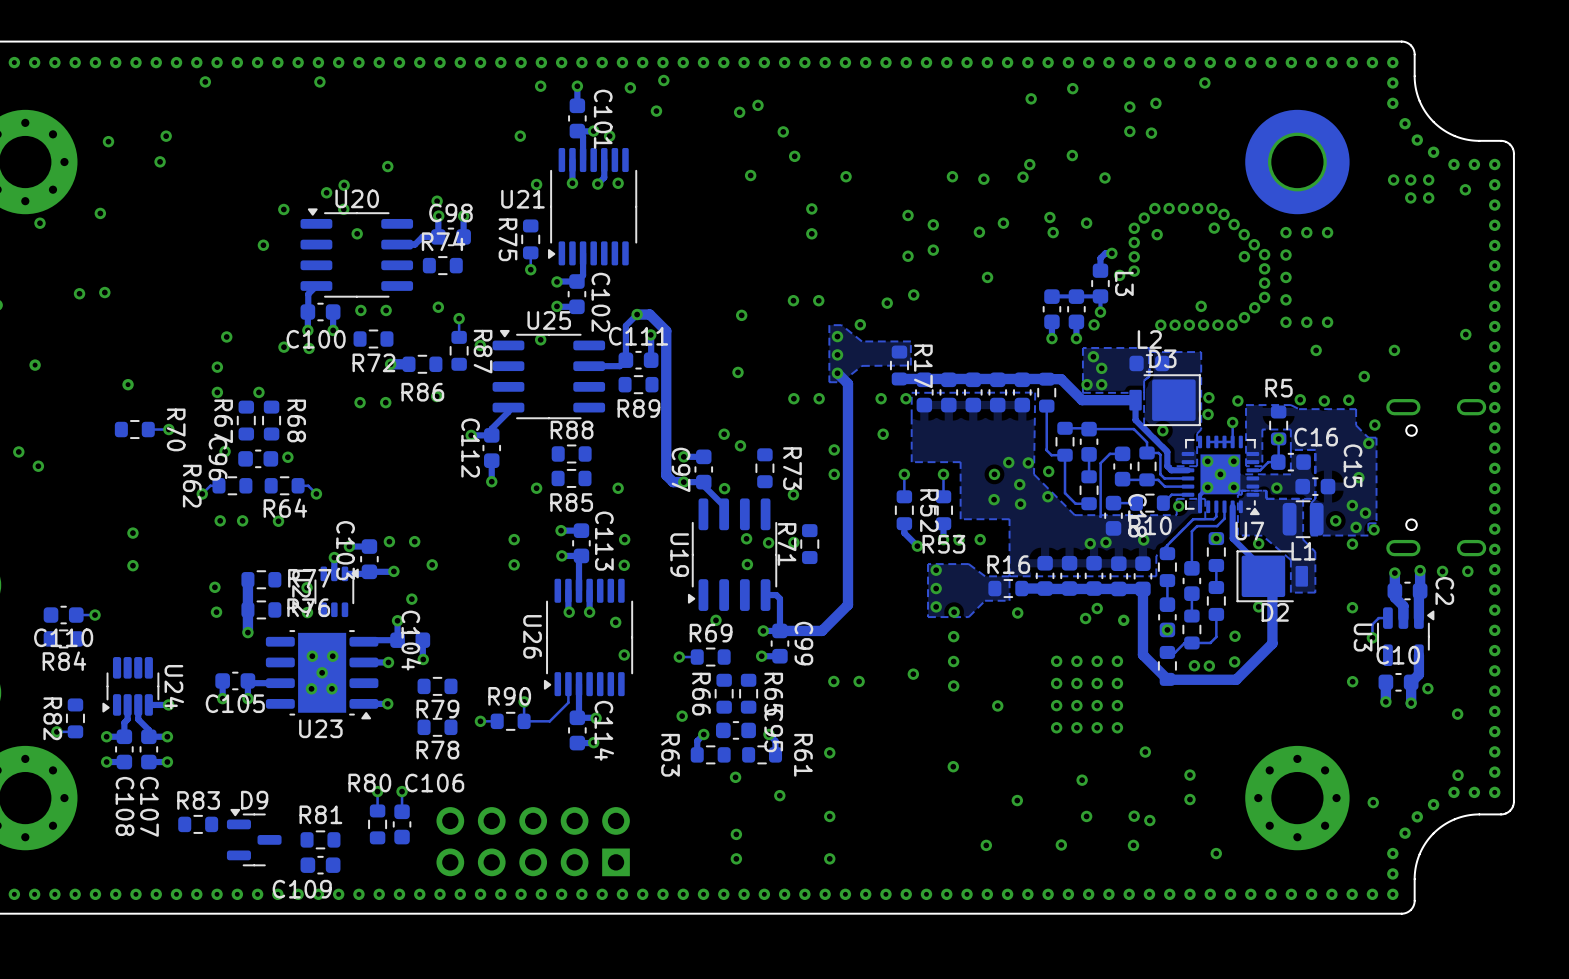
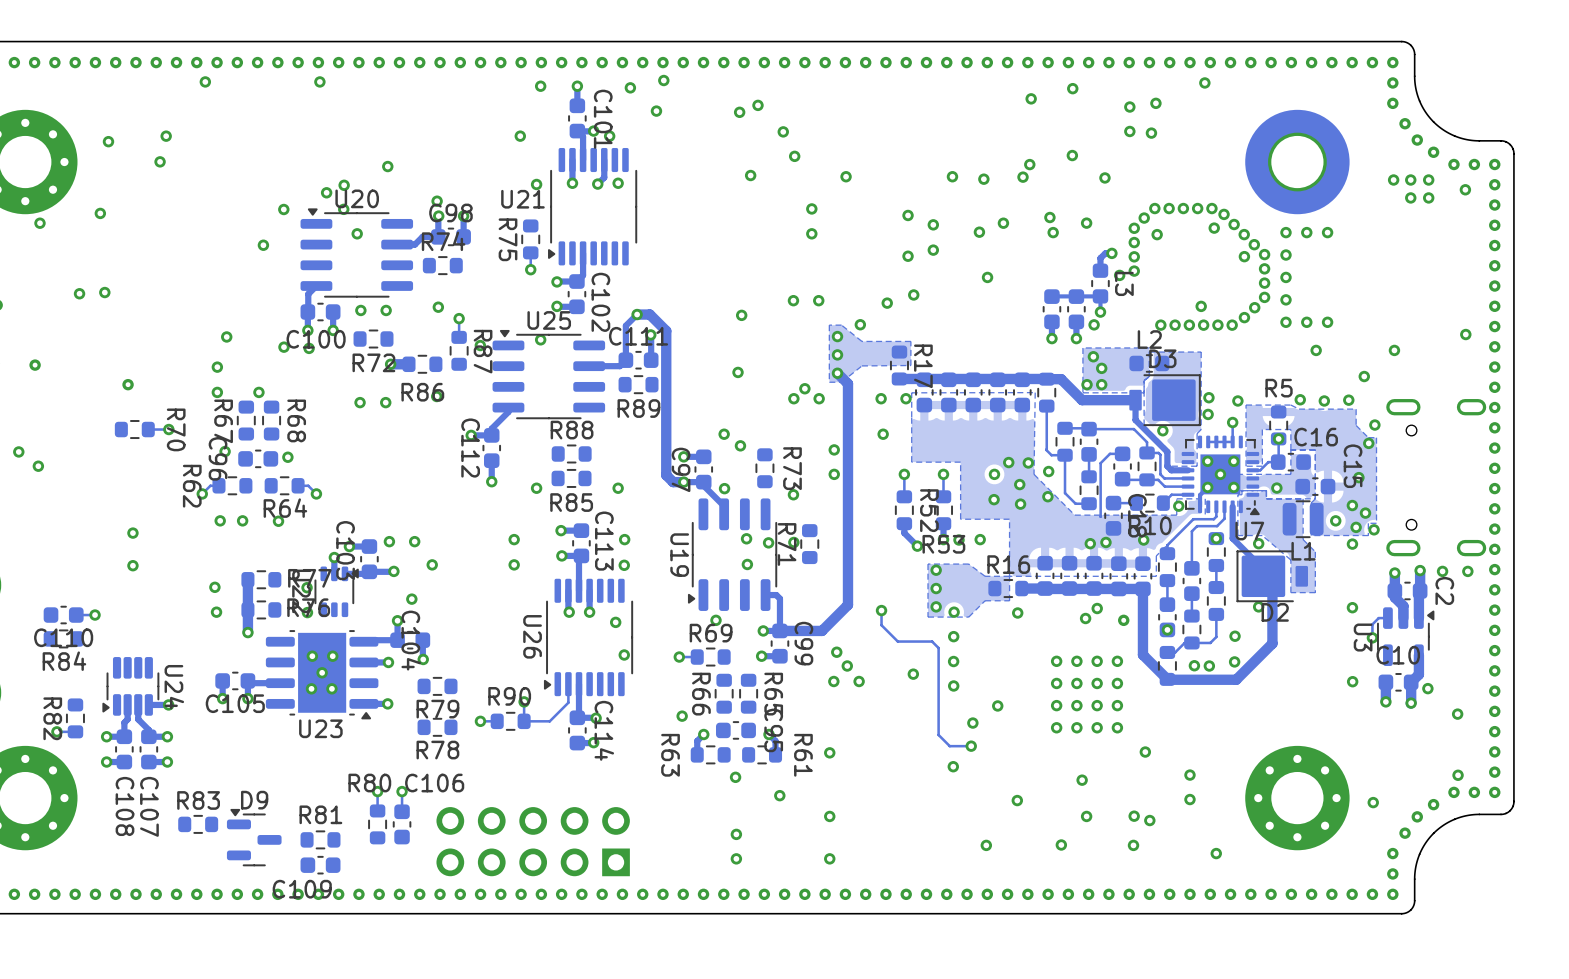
via: none -> (804, 388)
track: none -> (881, 610) (881, 625) (897, 641) (932, 641) (938, 648) (938, 734) (949, 746) (971, 746)
via: none -> (881, 610)
via: none -> (836, 652)
via: none -> (847, 666)
via: none -> (972, 723)
via: none -> (971, 746)

